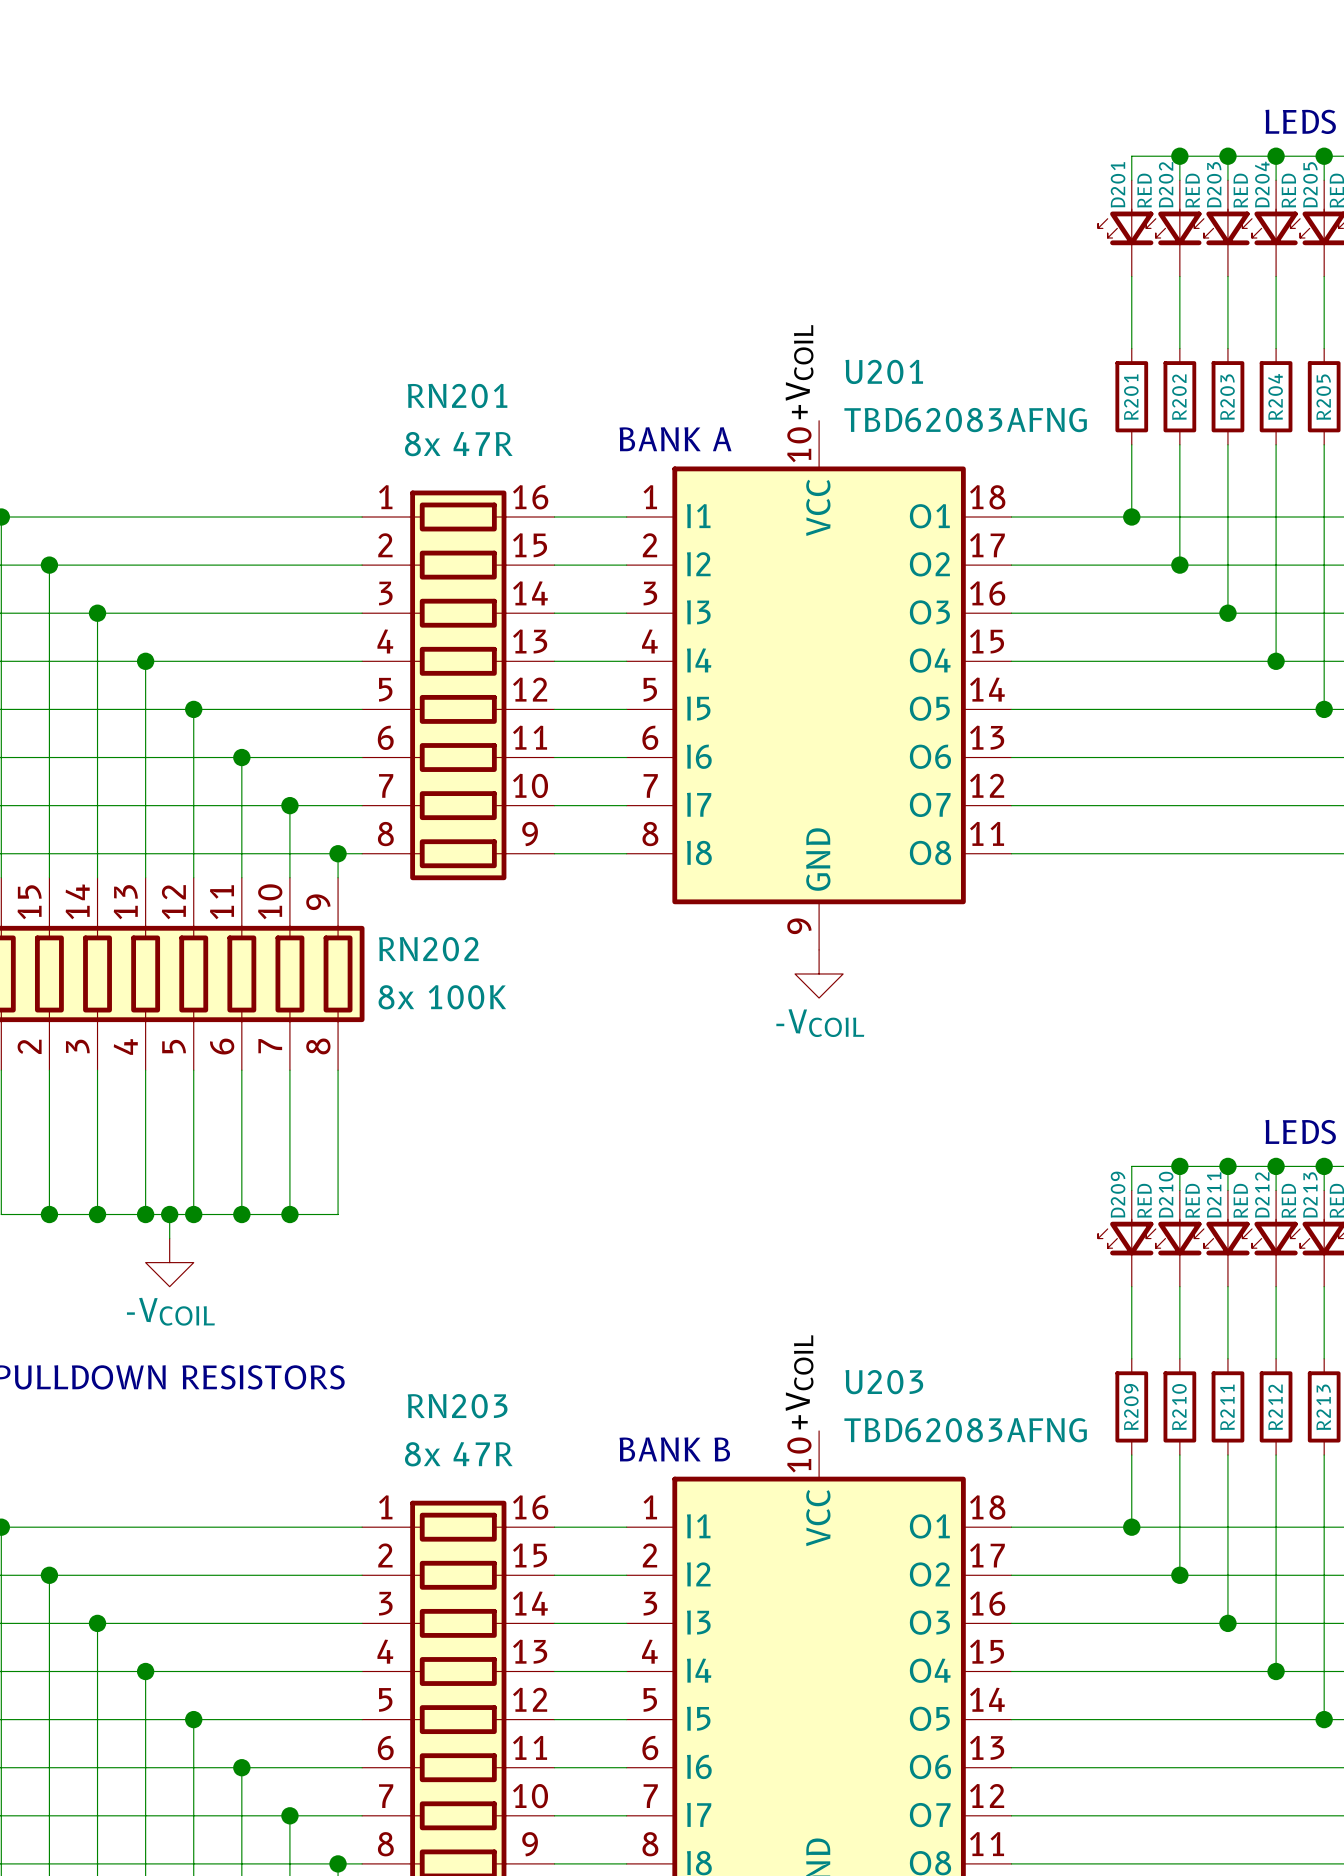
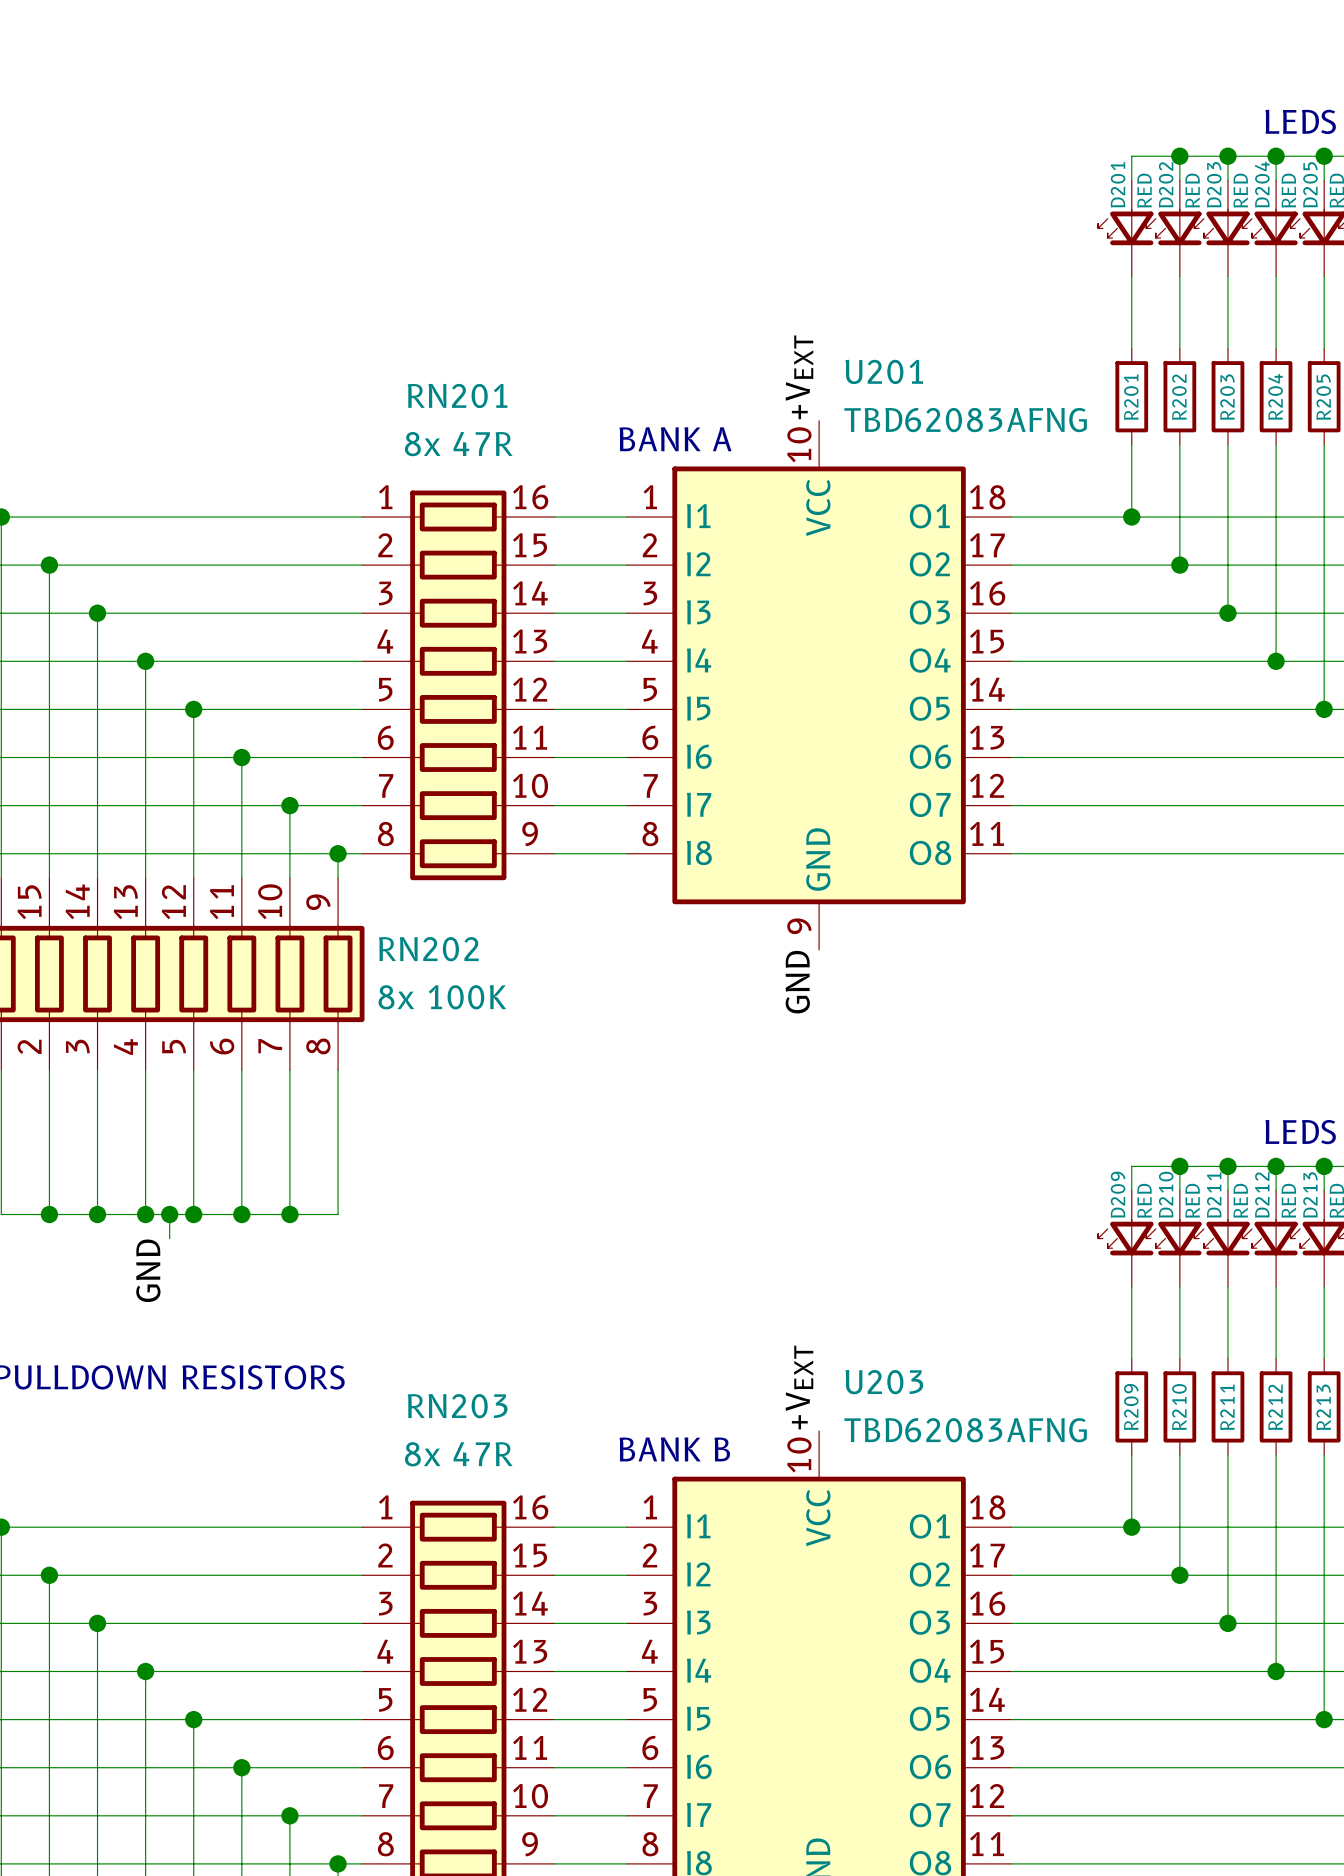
label: +VCOIL (799, 372) -> +VEXT (799, 377)
power symbol: -VCOIL (819, 973) -> none
label: none -> GND (797, 982)
power symbol: -VCOIL (169, 1262) -> none
label: none -> GND (148, 1270)
label: +VCOIL (799, 1382) -> +VEXT (799, 1387)

